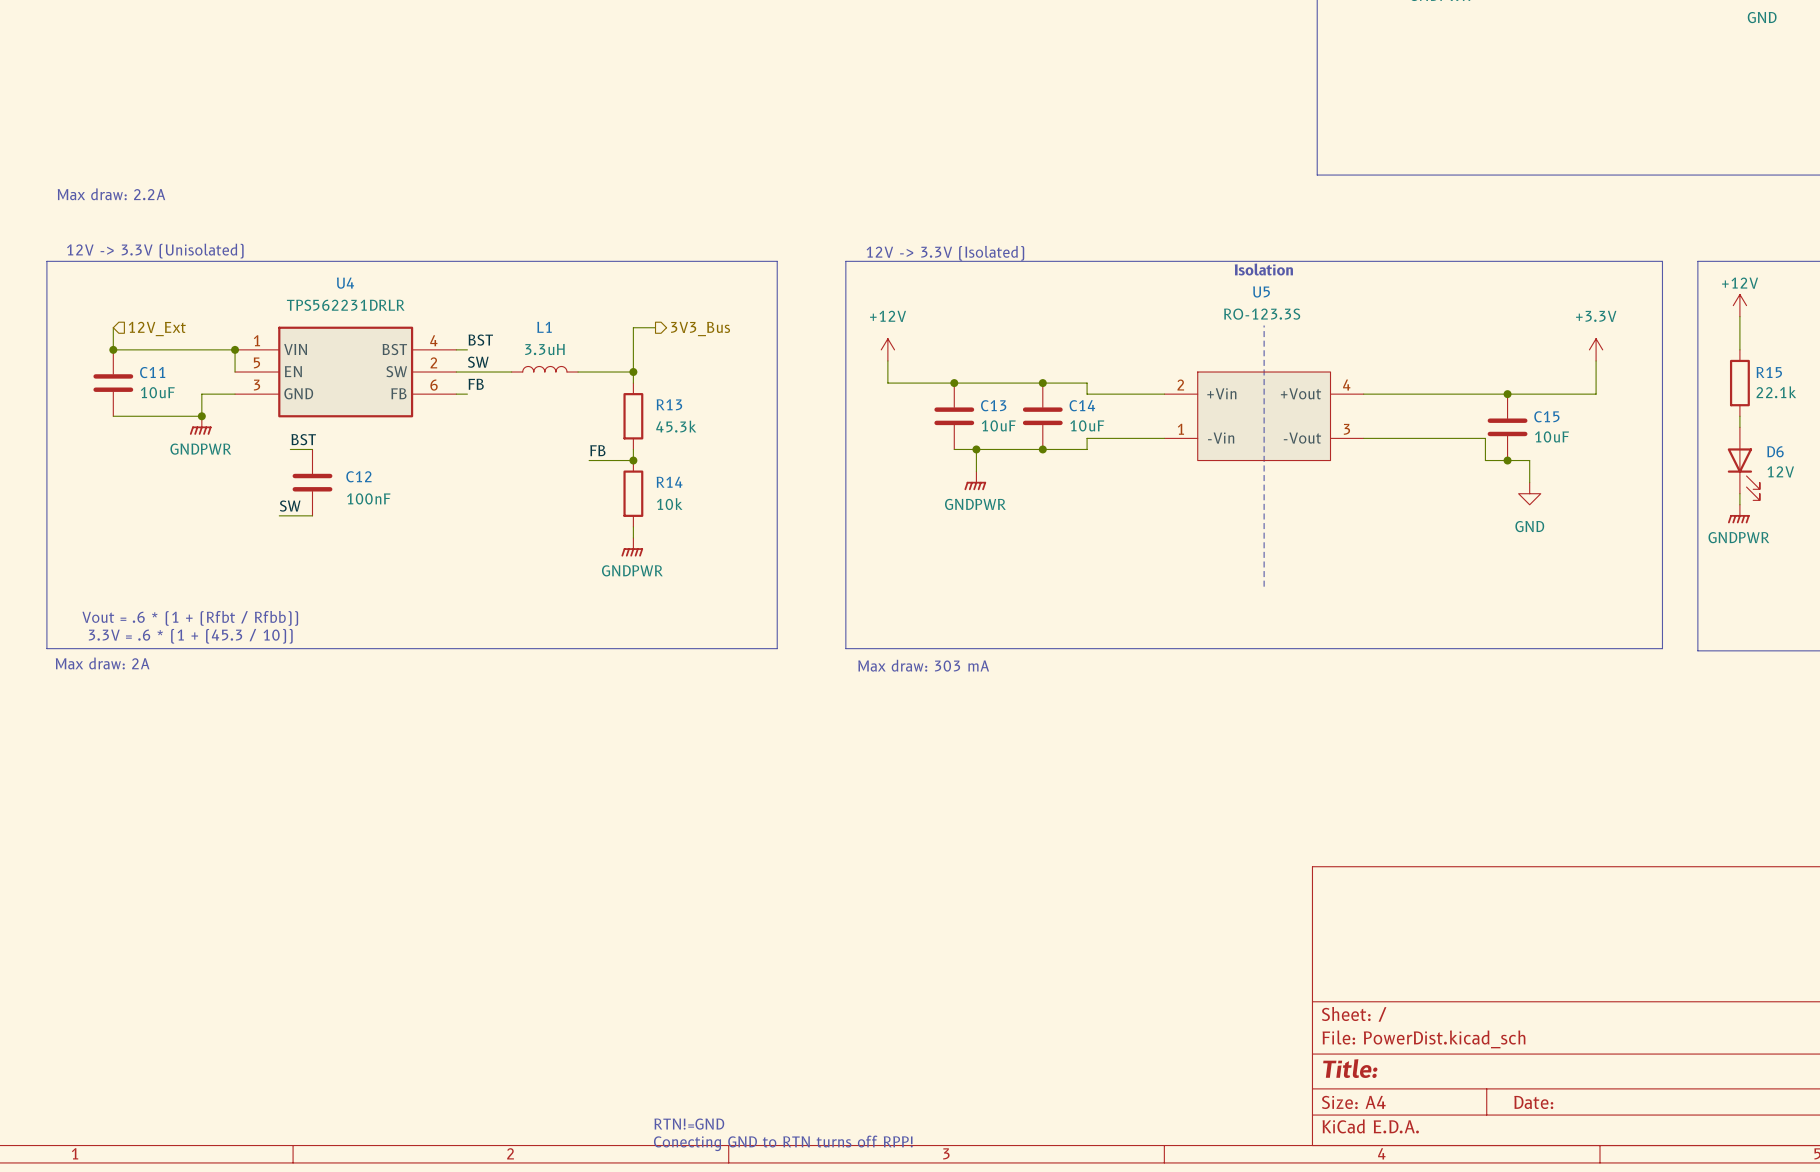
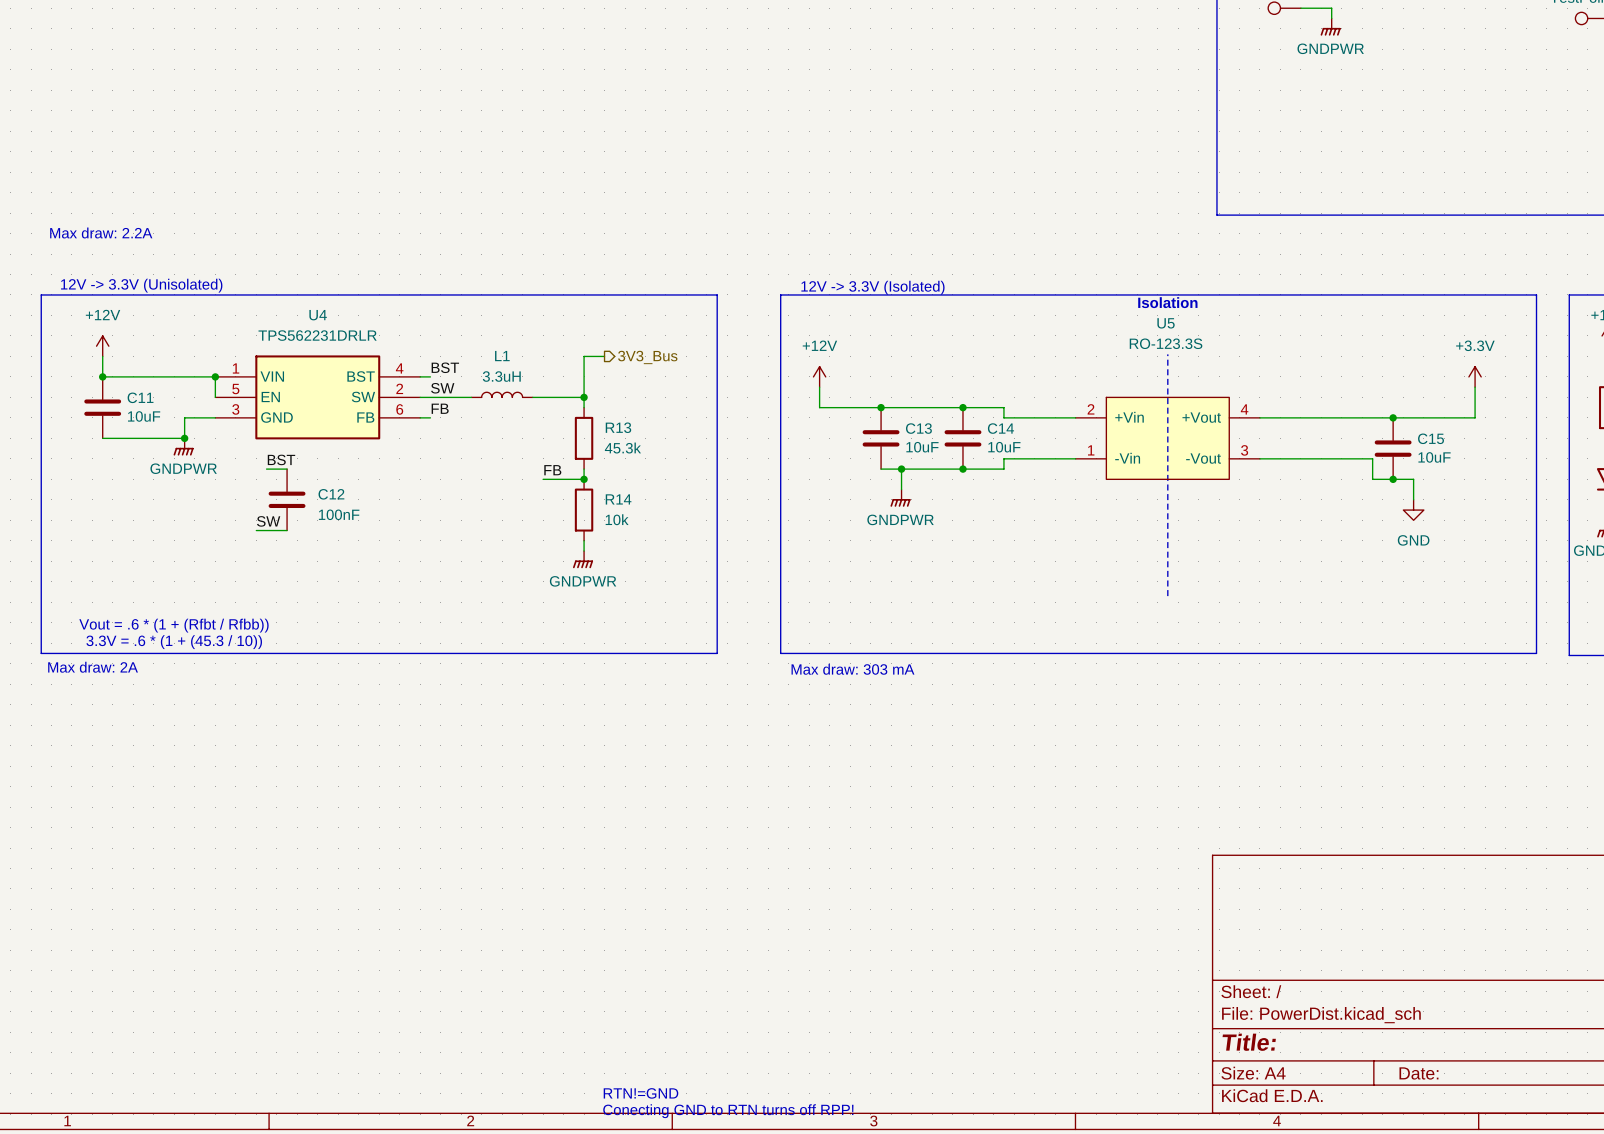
power symbol: none -> +12V (102, 346)
hierarchical label: 12V_Ext (157, 328) -> none

